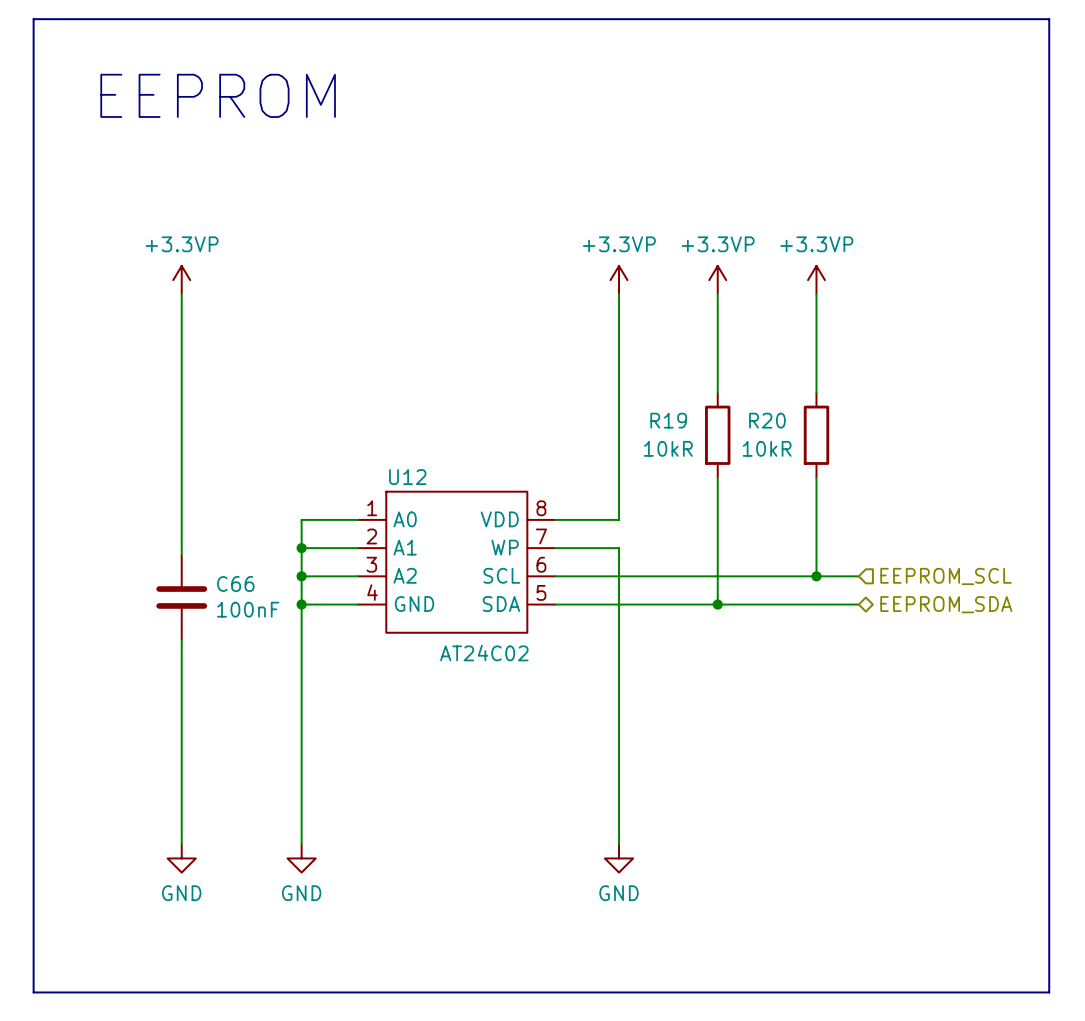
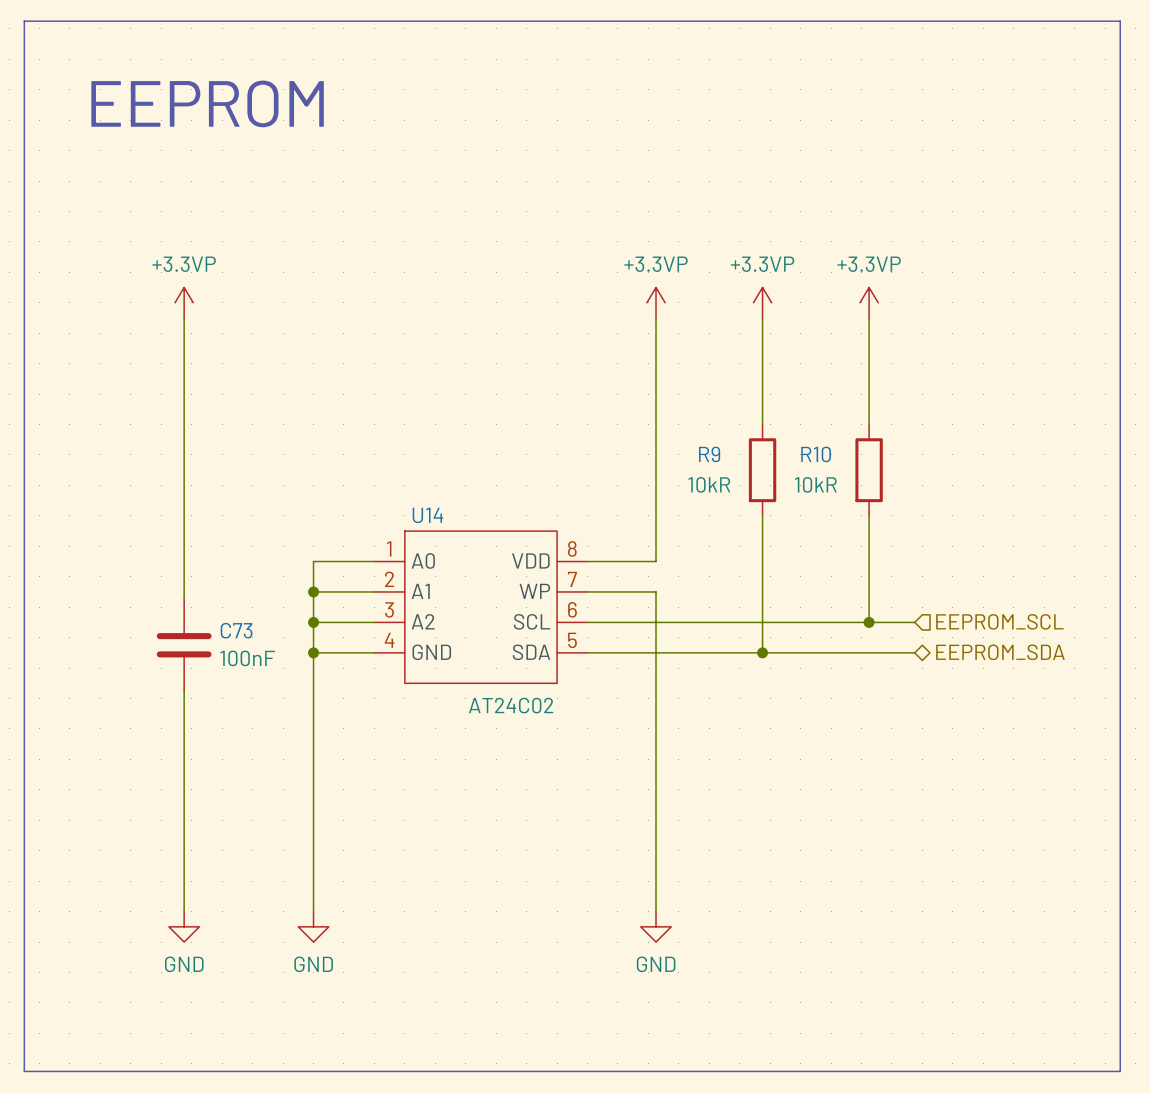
R19 name: R19 (668, 420) -> R9 (709, 454)
R20 name: R20 (767, 420) -> R10 (816, 454)
U12 name: U12 (407, 477) -> U14 (427, 515)
C66 name: C66 (235, 583) -> C73 (236, 630)

